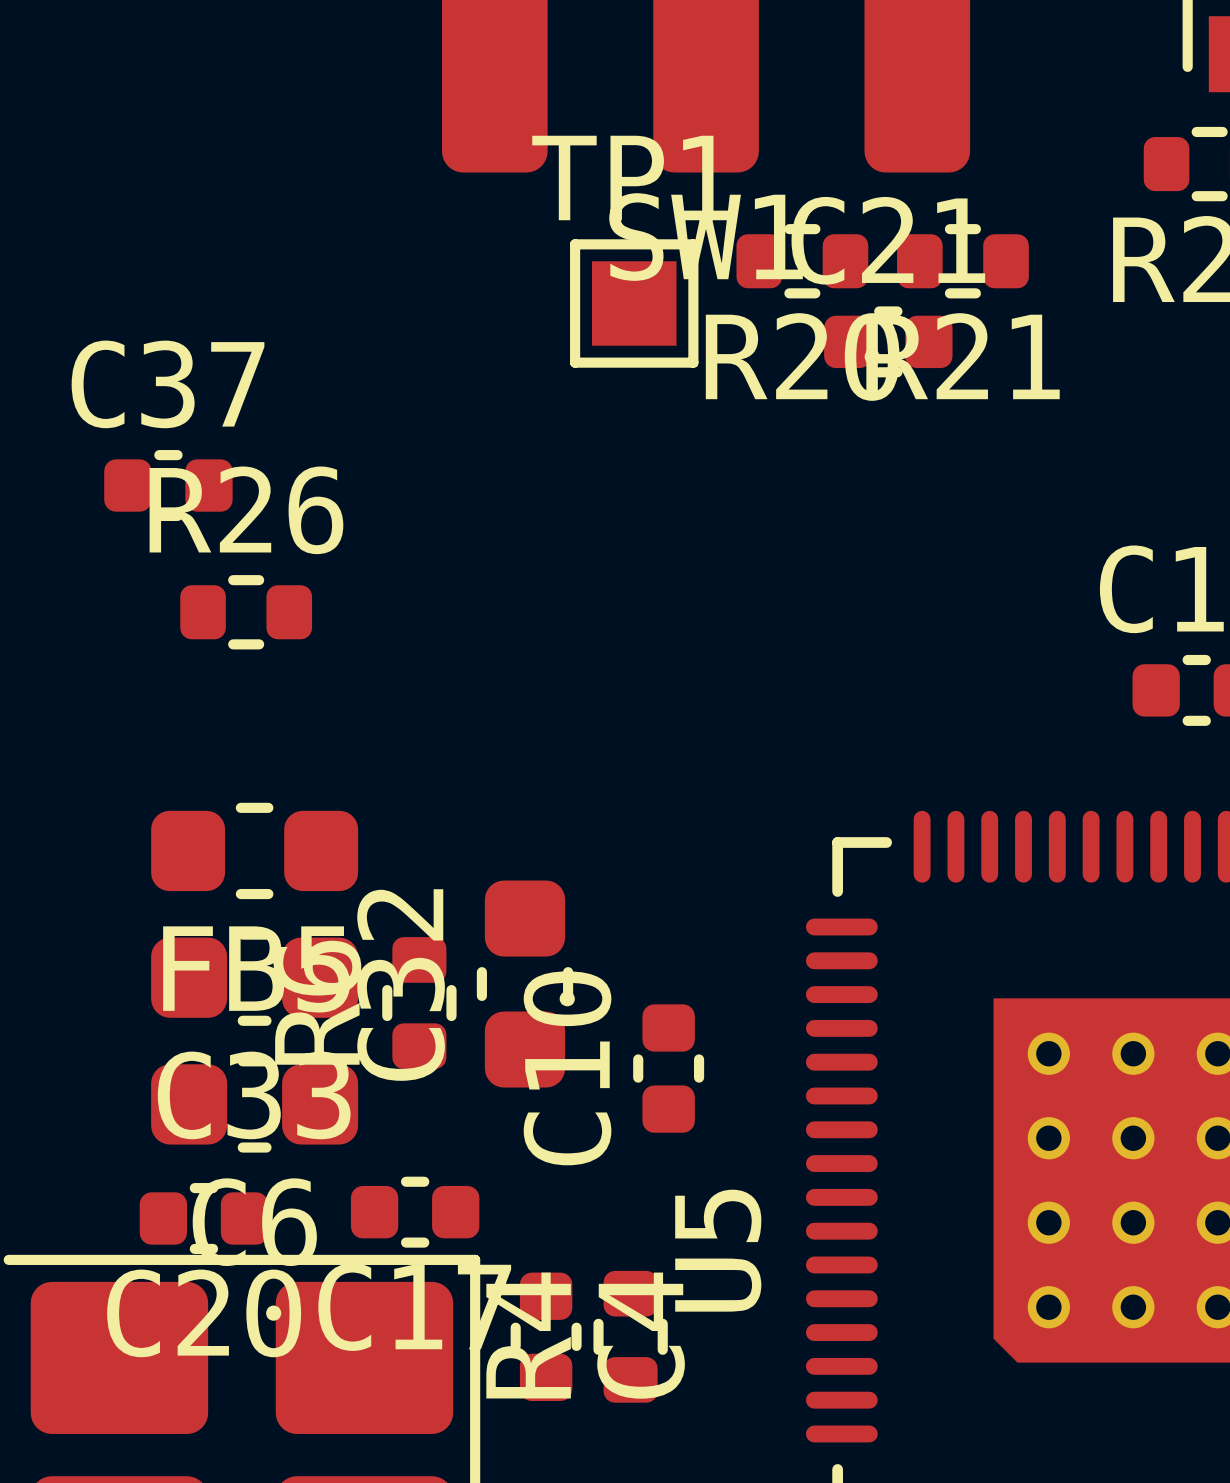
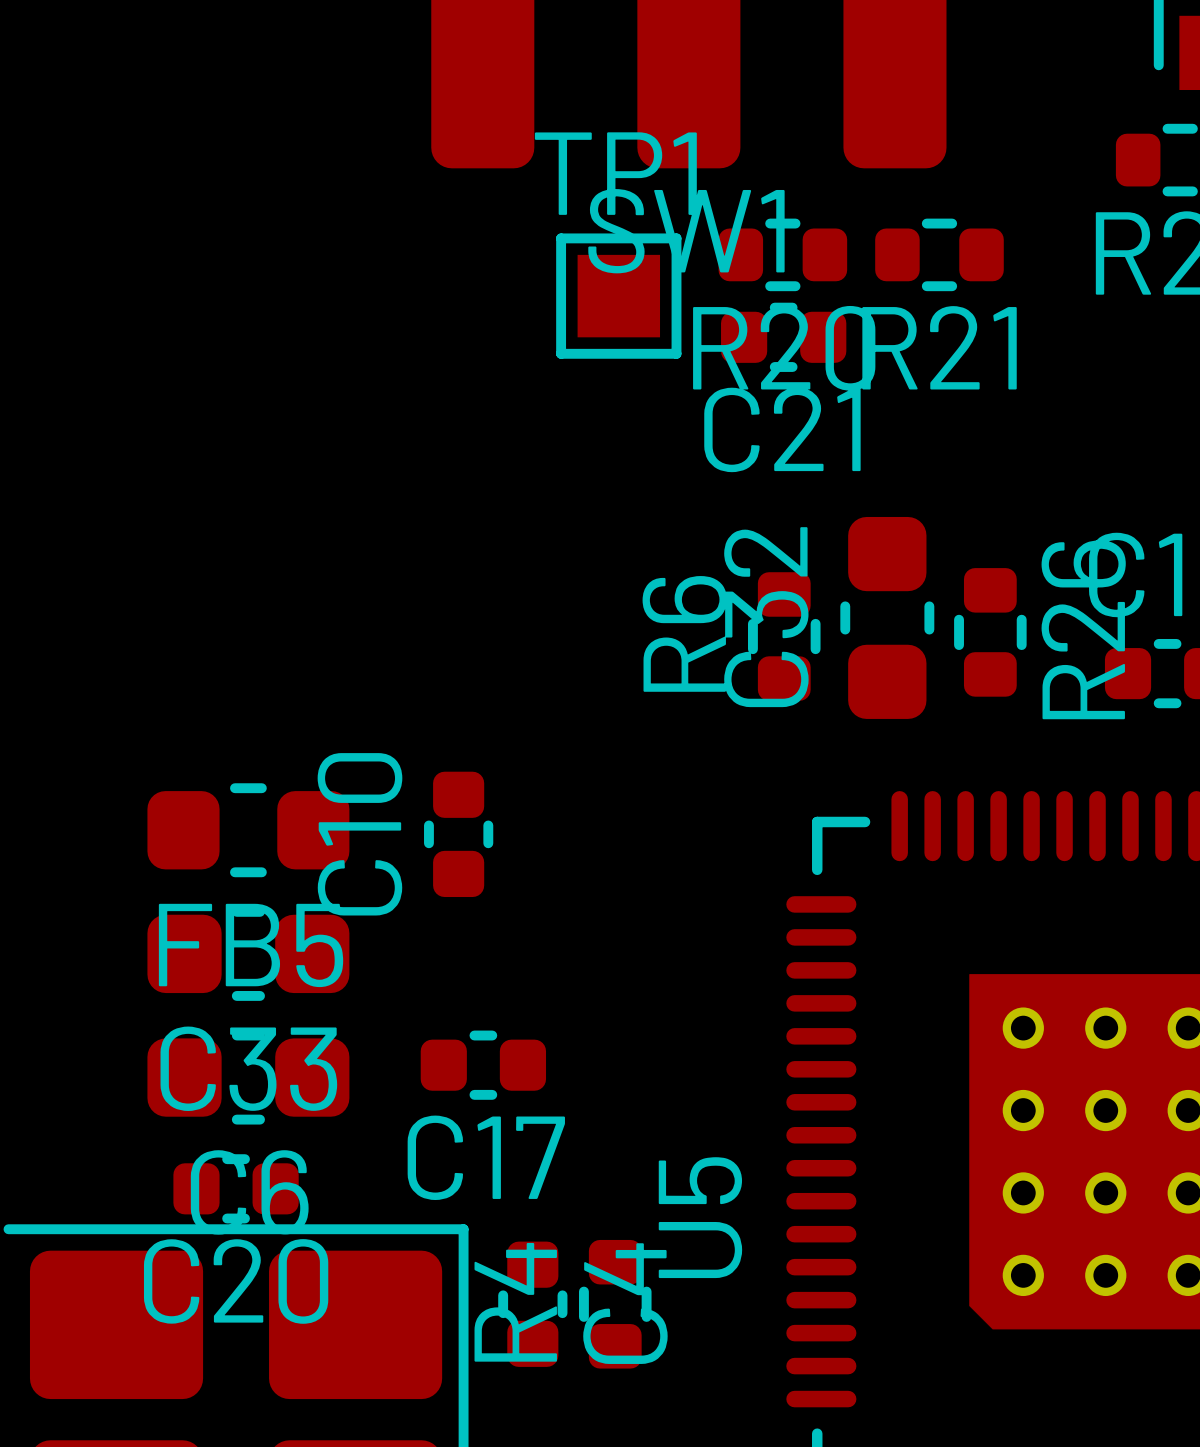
C21 name position: C21 (888, 240) -> C21 (782, 429)
C21 position: (888, 341) -> (783, 337)
C37: (168, 485) -> none
R26 rotation: 0° (246, 612) -> 90° clockwise (990, 632)
R26 position: (246, 612) -> (990, 632)
C32 position: (525, 984) -> (887, 617)
R6 position: (419, 1003) -> (784, 636)
C10 position: (668, 1068) -> (458, 834)
C17 position: (415, 1212) -> (483, 1065)
C20 position: (203, 1218) -> (236, 1188)

